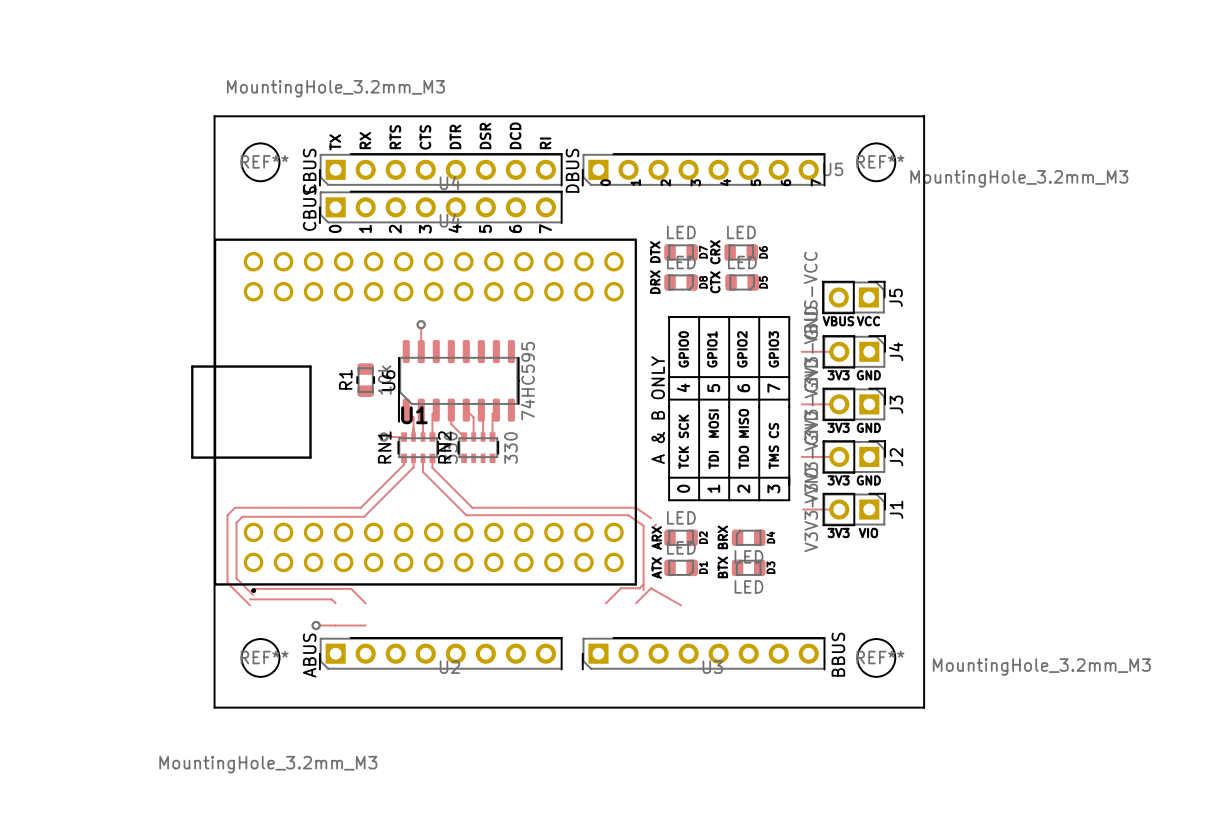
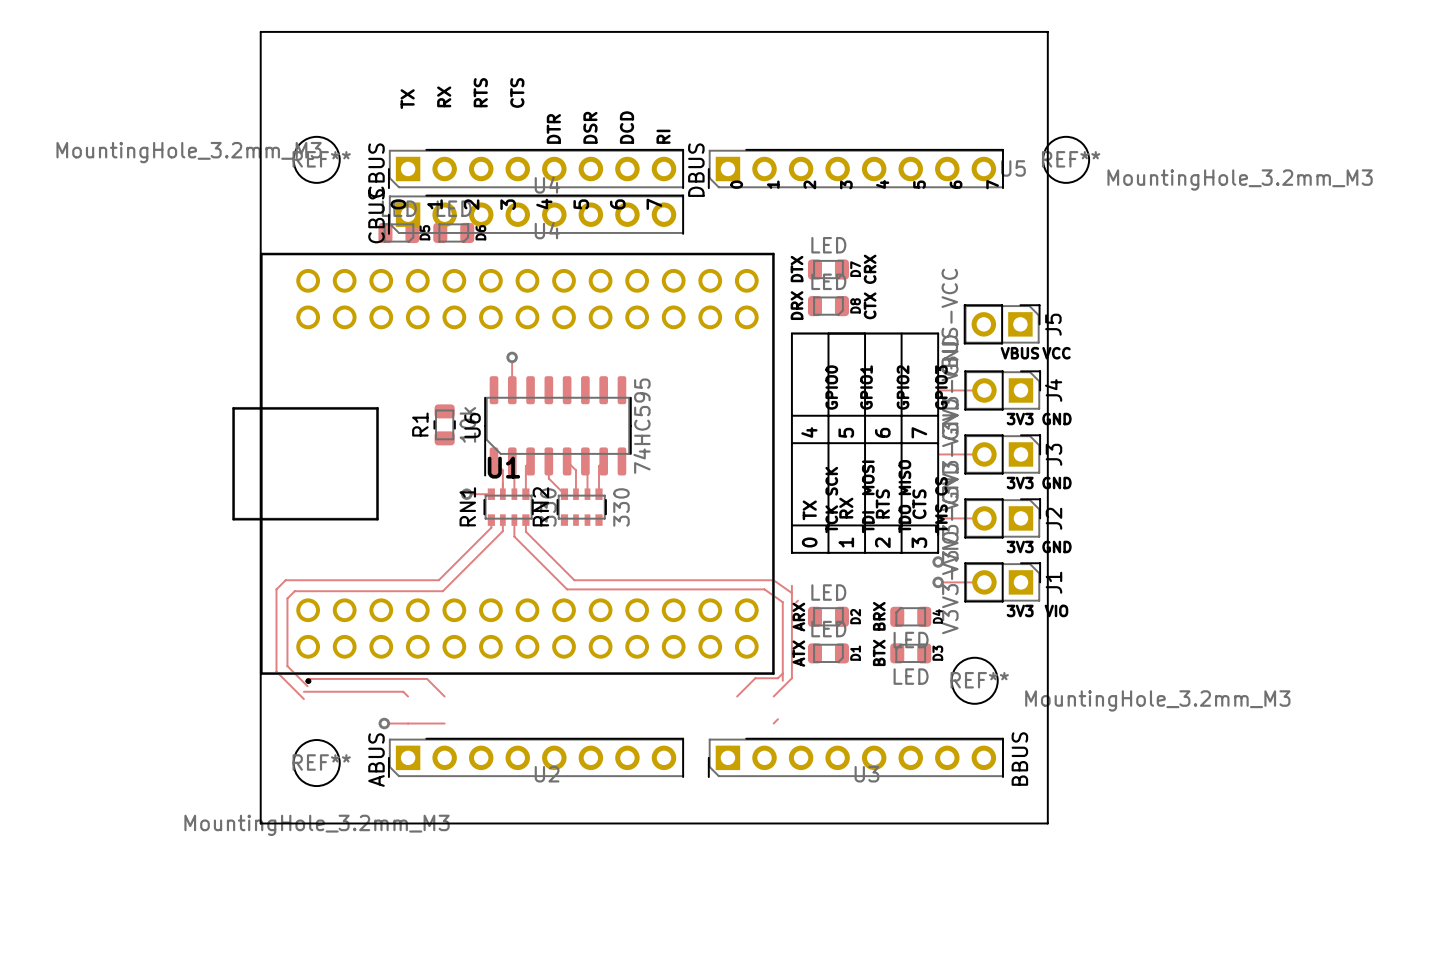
REF** value position: MountingHole_3.2mm_M3 (335, 88) -> MountingHole_3.2mm_M3 (189, 152)
board edge: (214, 116) (924, 116) (924, 707) (861, 707) -> (260, 103) (260, 31) (1047, 31) (1047, 823)
text position: RTS (395, 137) -> RTS (480, 92)
text position: CTS (425, 137) -> CTS (517, 92)
text position: RX (365, 140) -> RX (444, 96)
text position: TX (335, 142) -> TX (407, 99)
text position: 0 (335, 228) -> 0 (398, 204)
text position: 1 (365, 228) -> 1 (435, 204)
text position: 4 (455, 228) -> 4 (544, 204)
text position: 5 (485, 228) -> 5 (581, 204)
text position: 6 (515, 228) -> 6 (617, 204)
text position: 7 (545, 228) -> 7 (654, 204)
text position: 2 (395, 229) -> 2 (471, 204)
text position: 3 (425, 229) -> 3 (508, 204)
D6 position: (741, 252) -> (453, 232)
D5 position: (742, 282) -> (398, 232)
J5 position: (853, 297) -> (1002, 324)
line: none -> (901, 333) (901, 552)
line: (669, 317) (789, 317) (789, 500) (669, 500) (669, 317) -> (791, 333) (791, 552) (938, 552) (938, 333) (791, 333)
line: (699, 317) (699, 500) -> none
line: (729, 317) (729, 500) -> none
line: (759, 317) (759, 500) -> none
track: (809, 351) (839, 351) -> (938, 390) (975, 390)
J4 position: (854, 351) -> (1002, 390)
line: (669, 377) (789, 377) -> (791, 415) (938, 415)
text position: 4 (683, 387) -> 4 (809, 432)
text position: 5 (713, 388) -> 5 (846, 432)
text position: 6 (743, 388) -> 6 (882, 432)
text position: 7 (773, 388) -> 7 (919, 432)
line: (669, 399) (789, 399) -> (791, 443) (938, 443)
track: (809, 404) (839, 404) -> (938, 454) (975, 454)
J3 position: (854, 404) -> (1002, 454)
text: A & B ONLY (658, 410) -> none
text: none -> RTS (882, 503)
text: none -> CTS (919, 504)
text: none -> RX (846, 508)
text: none -> TX (809, 510)
track: (809, 456) (839, 456) -> (938, 518) (975, 518)
J2 position: (854, 456) -> (1002, 518)
line: (669, 477) (789, 477) -> (791, 525) (938, 525)
line: none -> (828, 552) (828, 333) (865, 333) (865, 552)
text position: 0 (683, 488) -> 0 (809, 542)
text position: 1 (713, 488) -> 1 (846, 542)
text position: 2 (743, 488) -> 2 (882, 542)
text position: 3 (773, 488) -> 3 (919, 542)
via: none -> (938, 561)
via: none -> (938, 582)
track: (809, 509) (839, 509) -> (940, 582) (976, 582)
J1 position: (854, 509) -> (1002, 582)
track: (651, 588) (681, 605) -> (791, 678) (791, 585)
track: none -> (778, 719) (773, 723)
REF** position: (876, 657) -> (974, 680)
REF** value position: MountingHole_3.2mm_M3 (1041, 666) -> MountingHole_3.2mm_M3 (1157, 700)
REF** value position: MountingHole_3.2mm_M3 (268, 764) -> MountingHole_3.2mm_M3 (317, 825)

